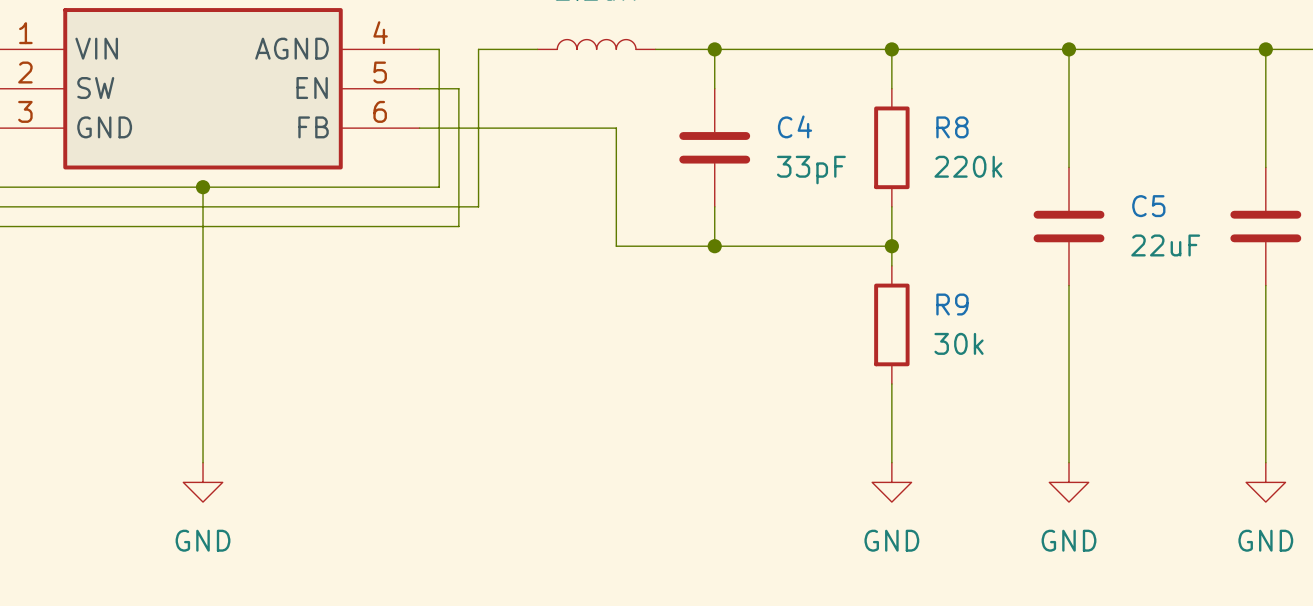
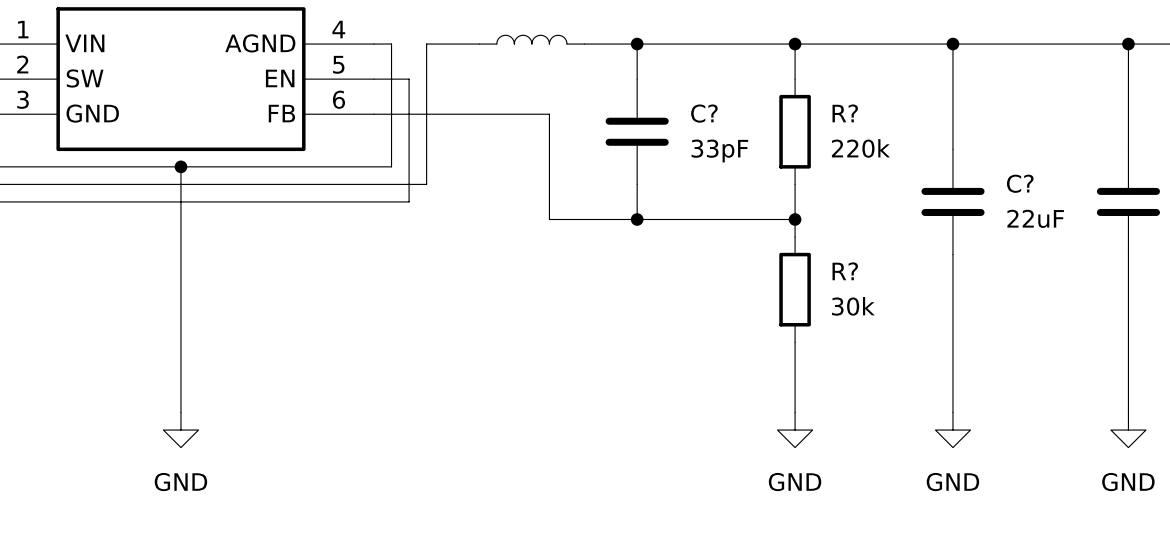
C4 name: C4 (795, 126) -> C? (704, 113)
R8 name: R8 (952, 127) -> R? (845, 113)
C5 name: C5 (1148, 206) -> C? (1020, 183)
R9 name: R9 (952, 304) -> R? (845, 271)

